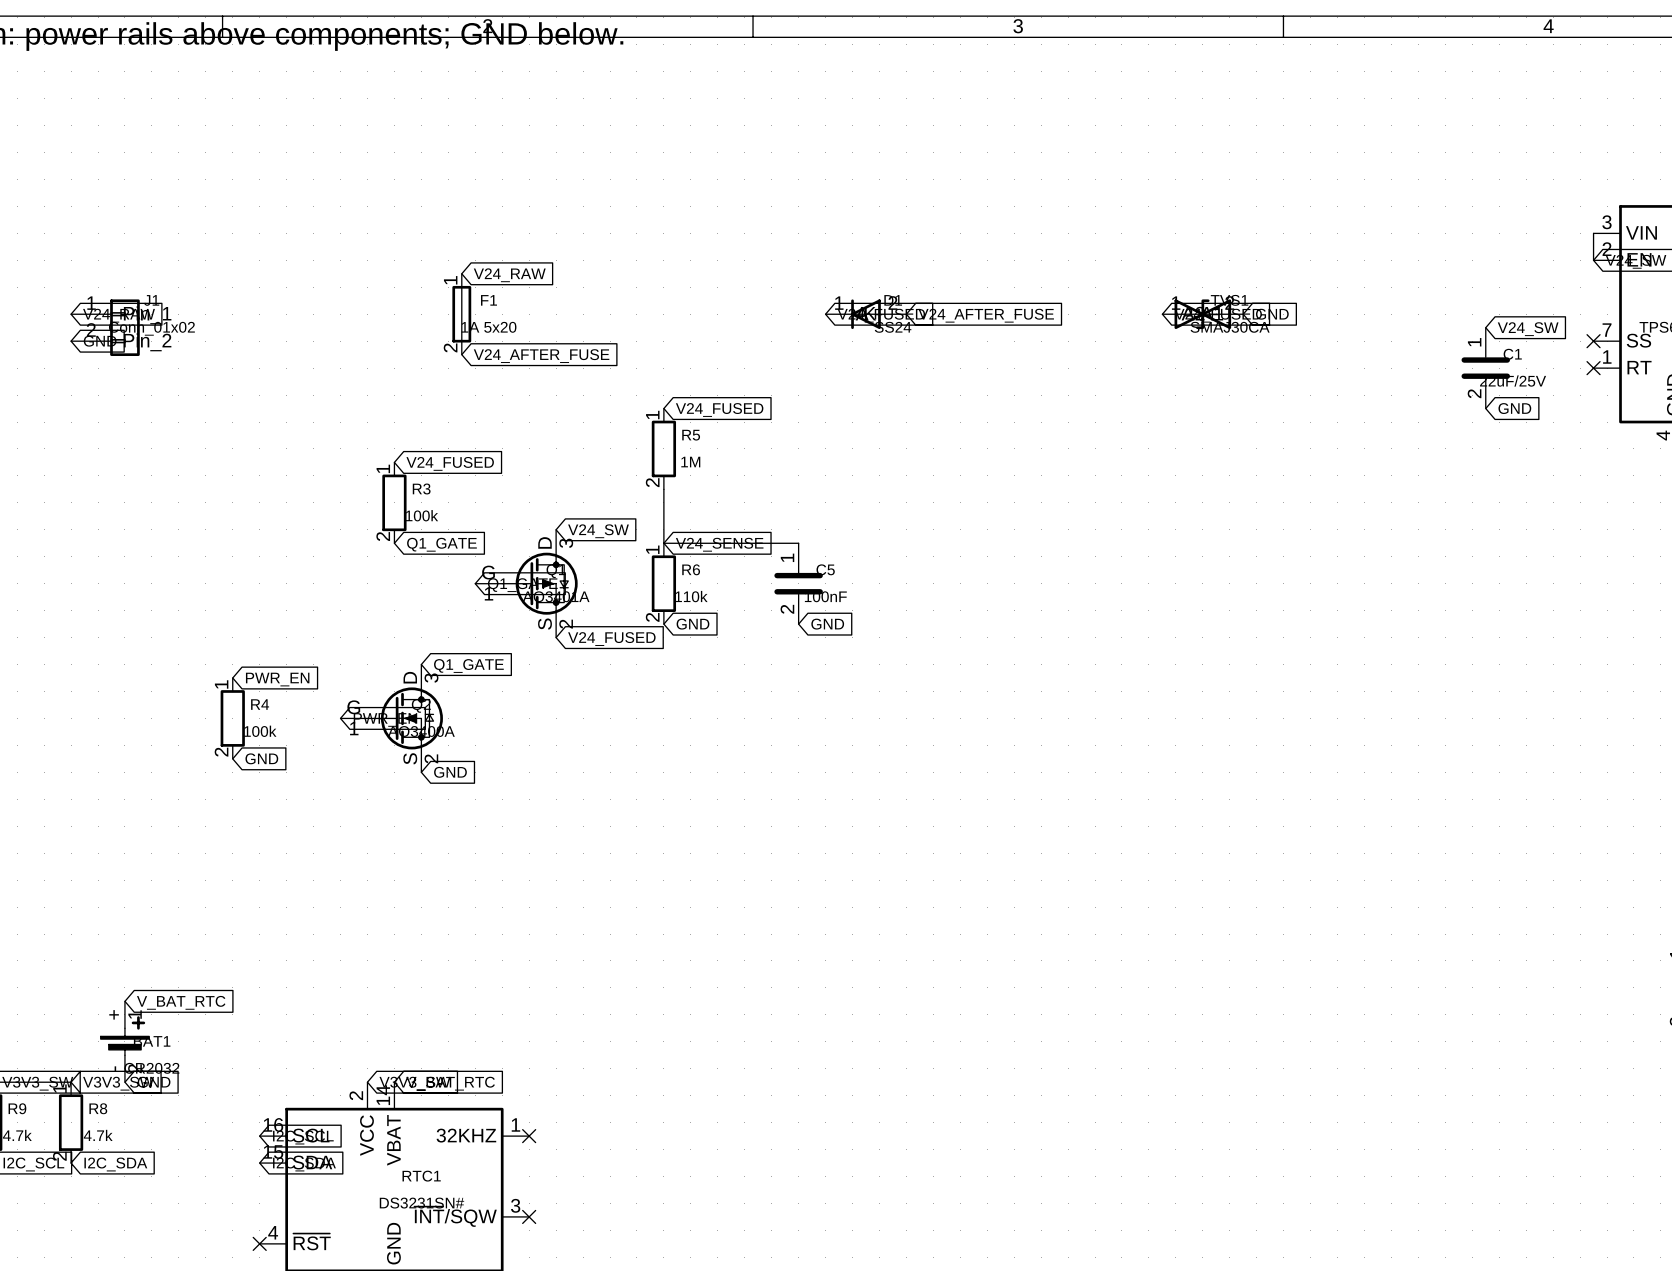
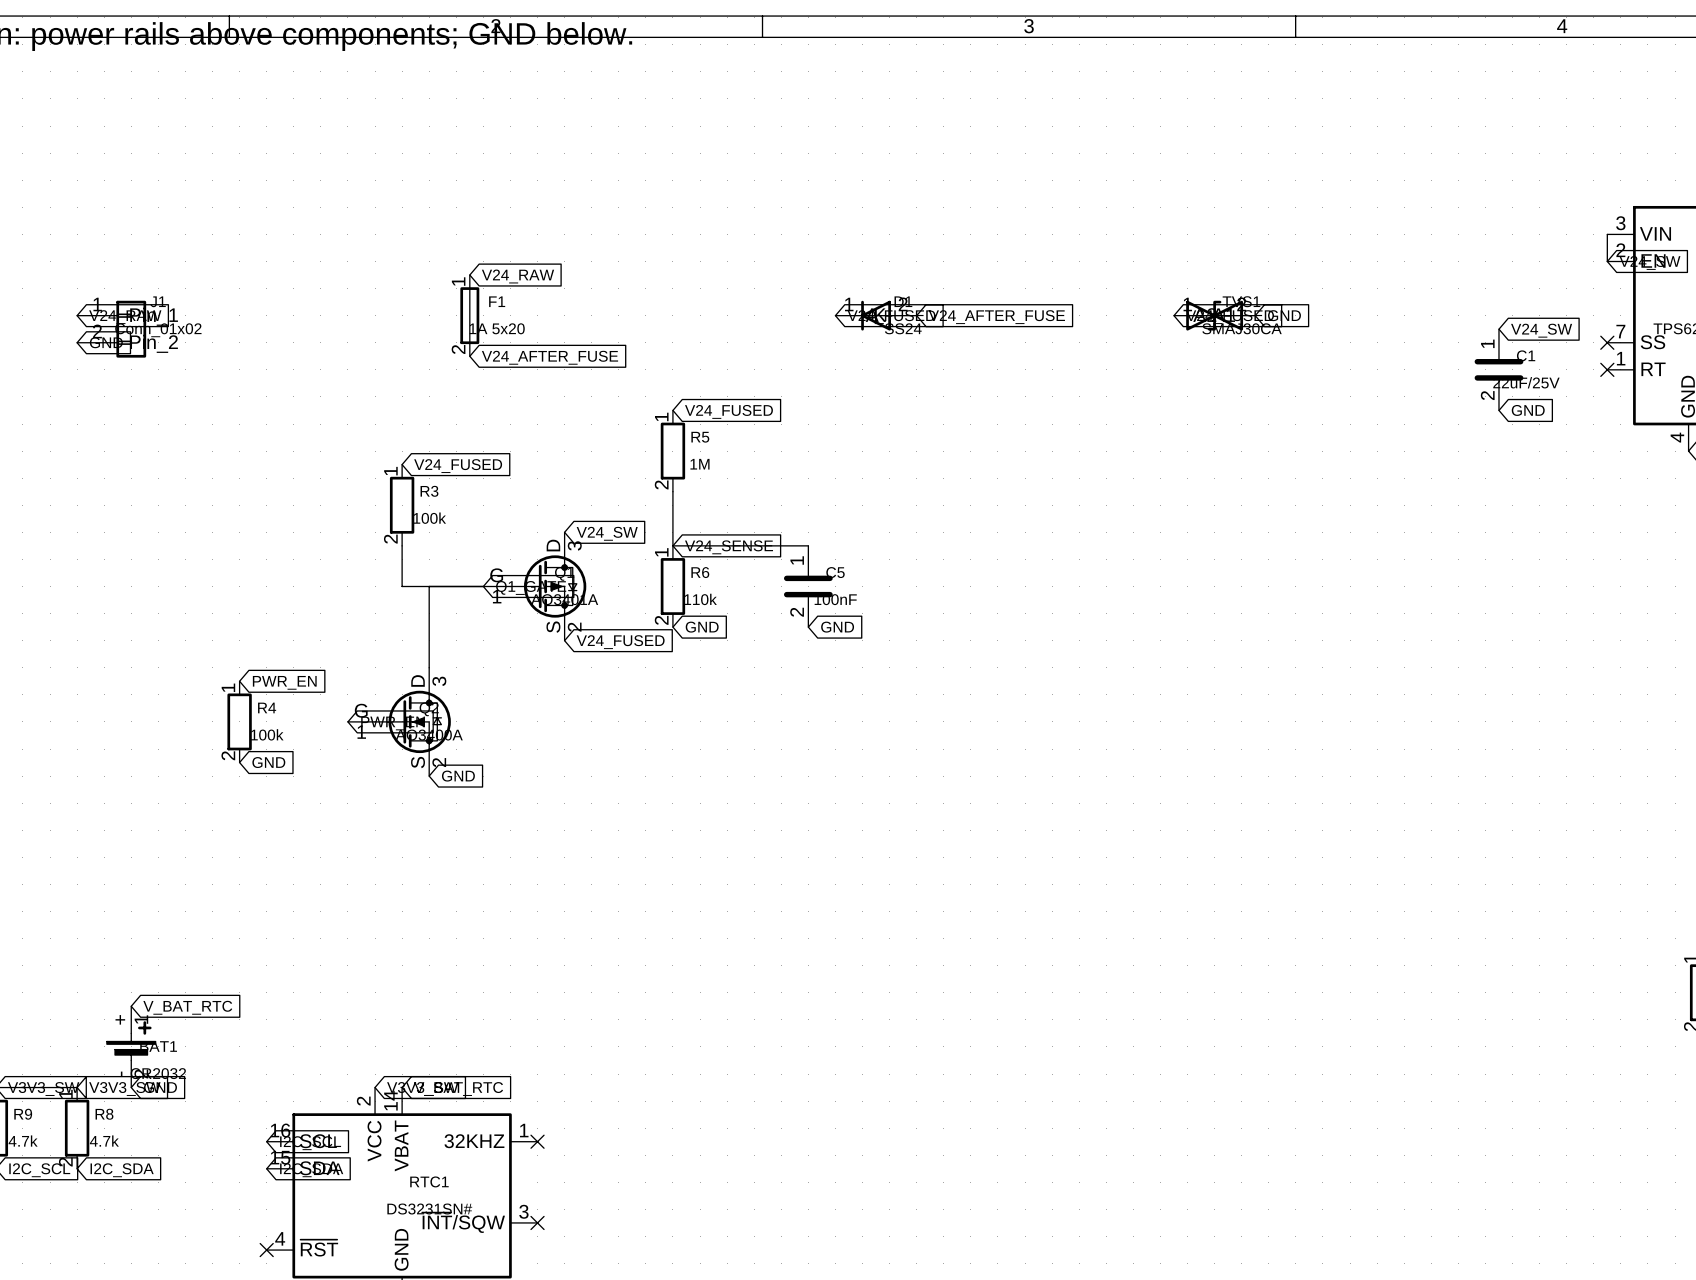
wire: none -> (402, 545) (402, 586) (483, 586)
global label: Q1_GATE (441, 544) -> none
wire: none -> (429, 586) (429, 667)
global label: Q1_GATE (468, 665) -> none

